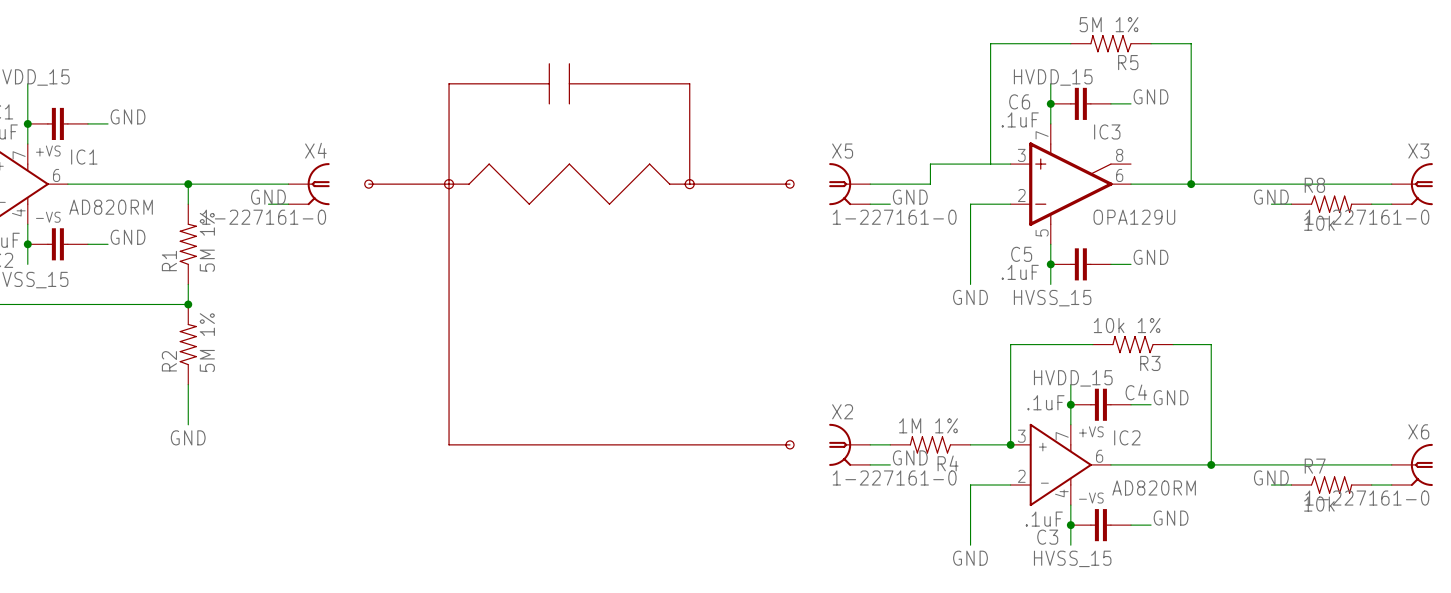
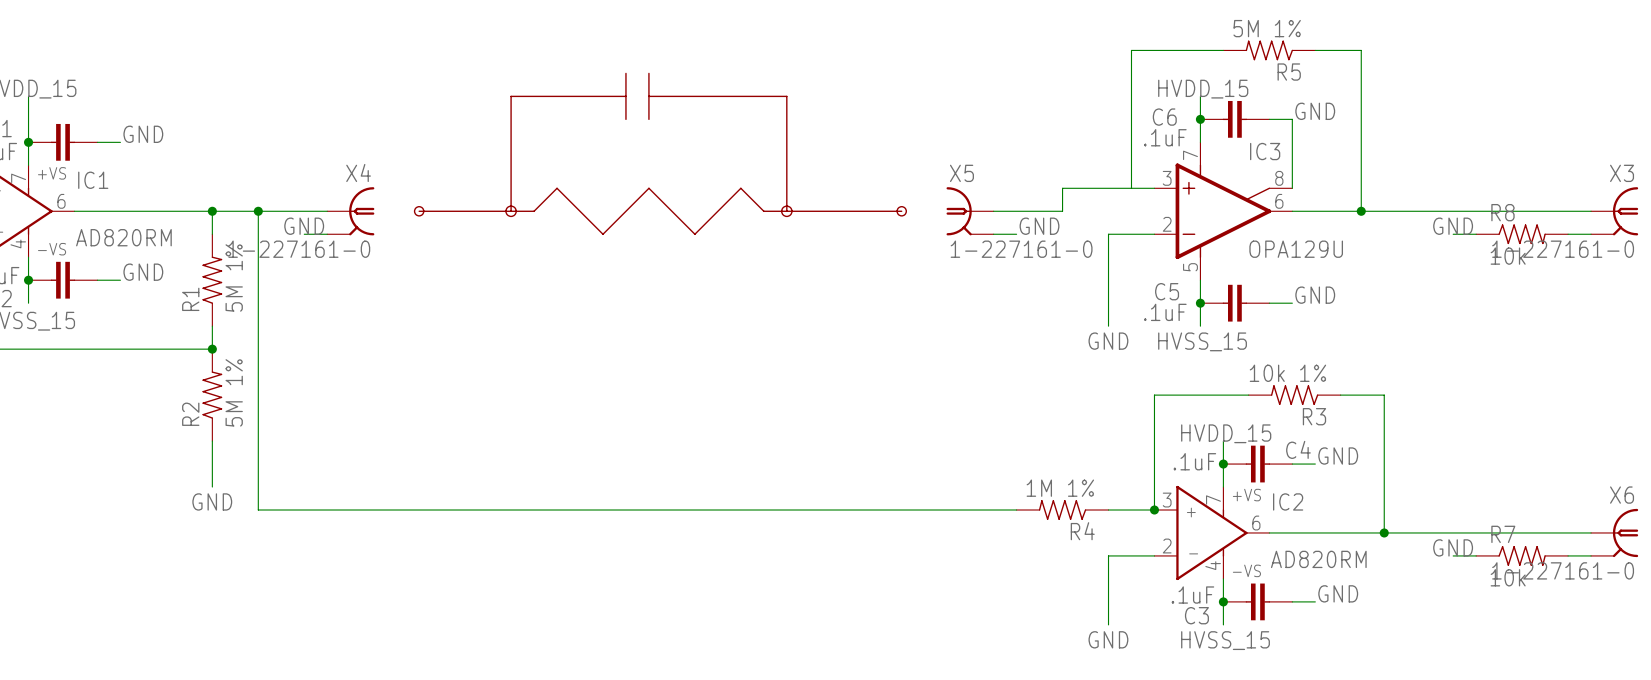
wire: none -> (1292, 119) (1292, 188)
wire: none -> (258, 211) (258, 510) (993, 510)
junction: none -> (258, 211)
line: (449, 184) (449, 444) (790, 444) -> none
drawing: [785, 440, 795, 450] -> none
X2: 1-227161-0 (849, 444) -> none
label: GND (910, 457) -> none
wire: (870, 464) (890, 464) -> none

